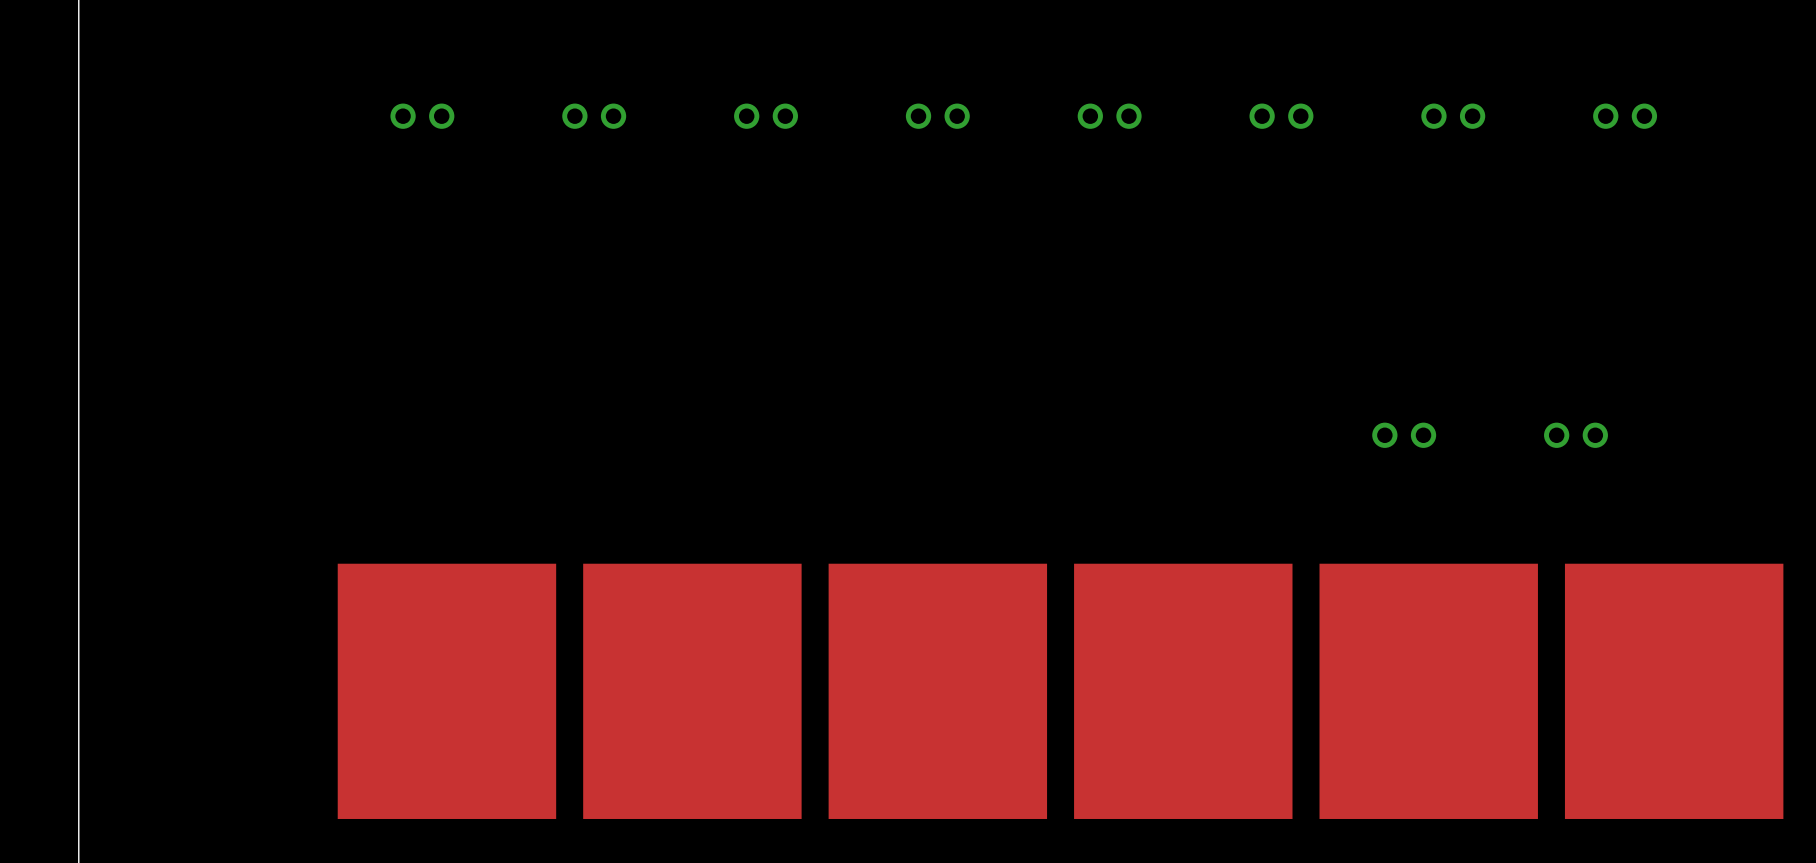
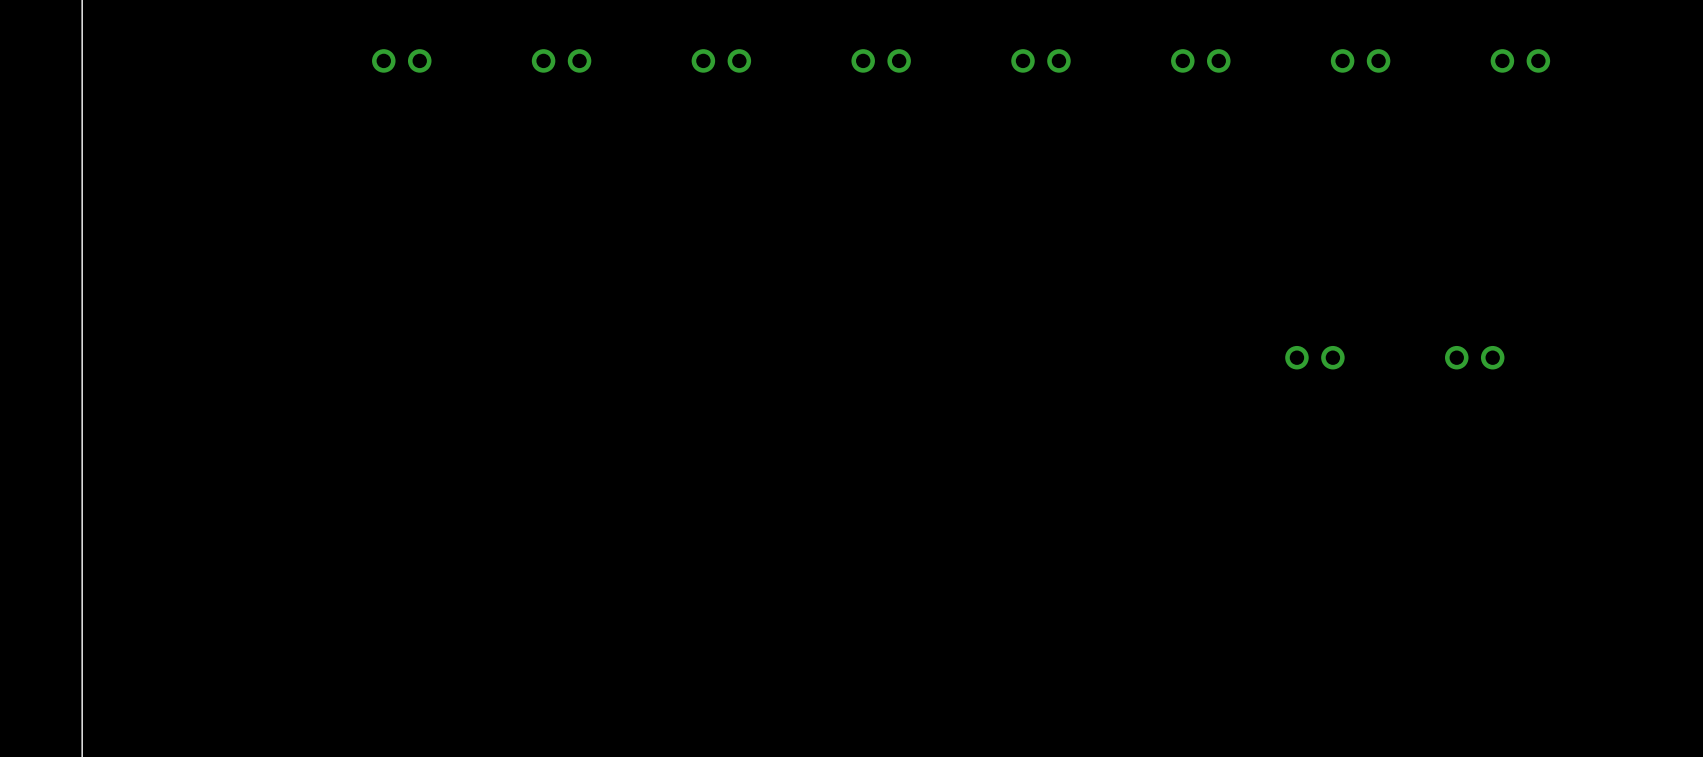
part: (446, 691) -> none
part: (692, 691) -> none
part: (937, 691) -> none
part: (1183, 691) -> none
part: (1428, 691) -> none
part: (1674, 691) -> none

